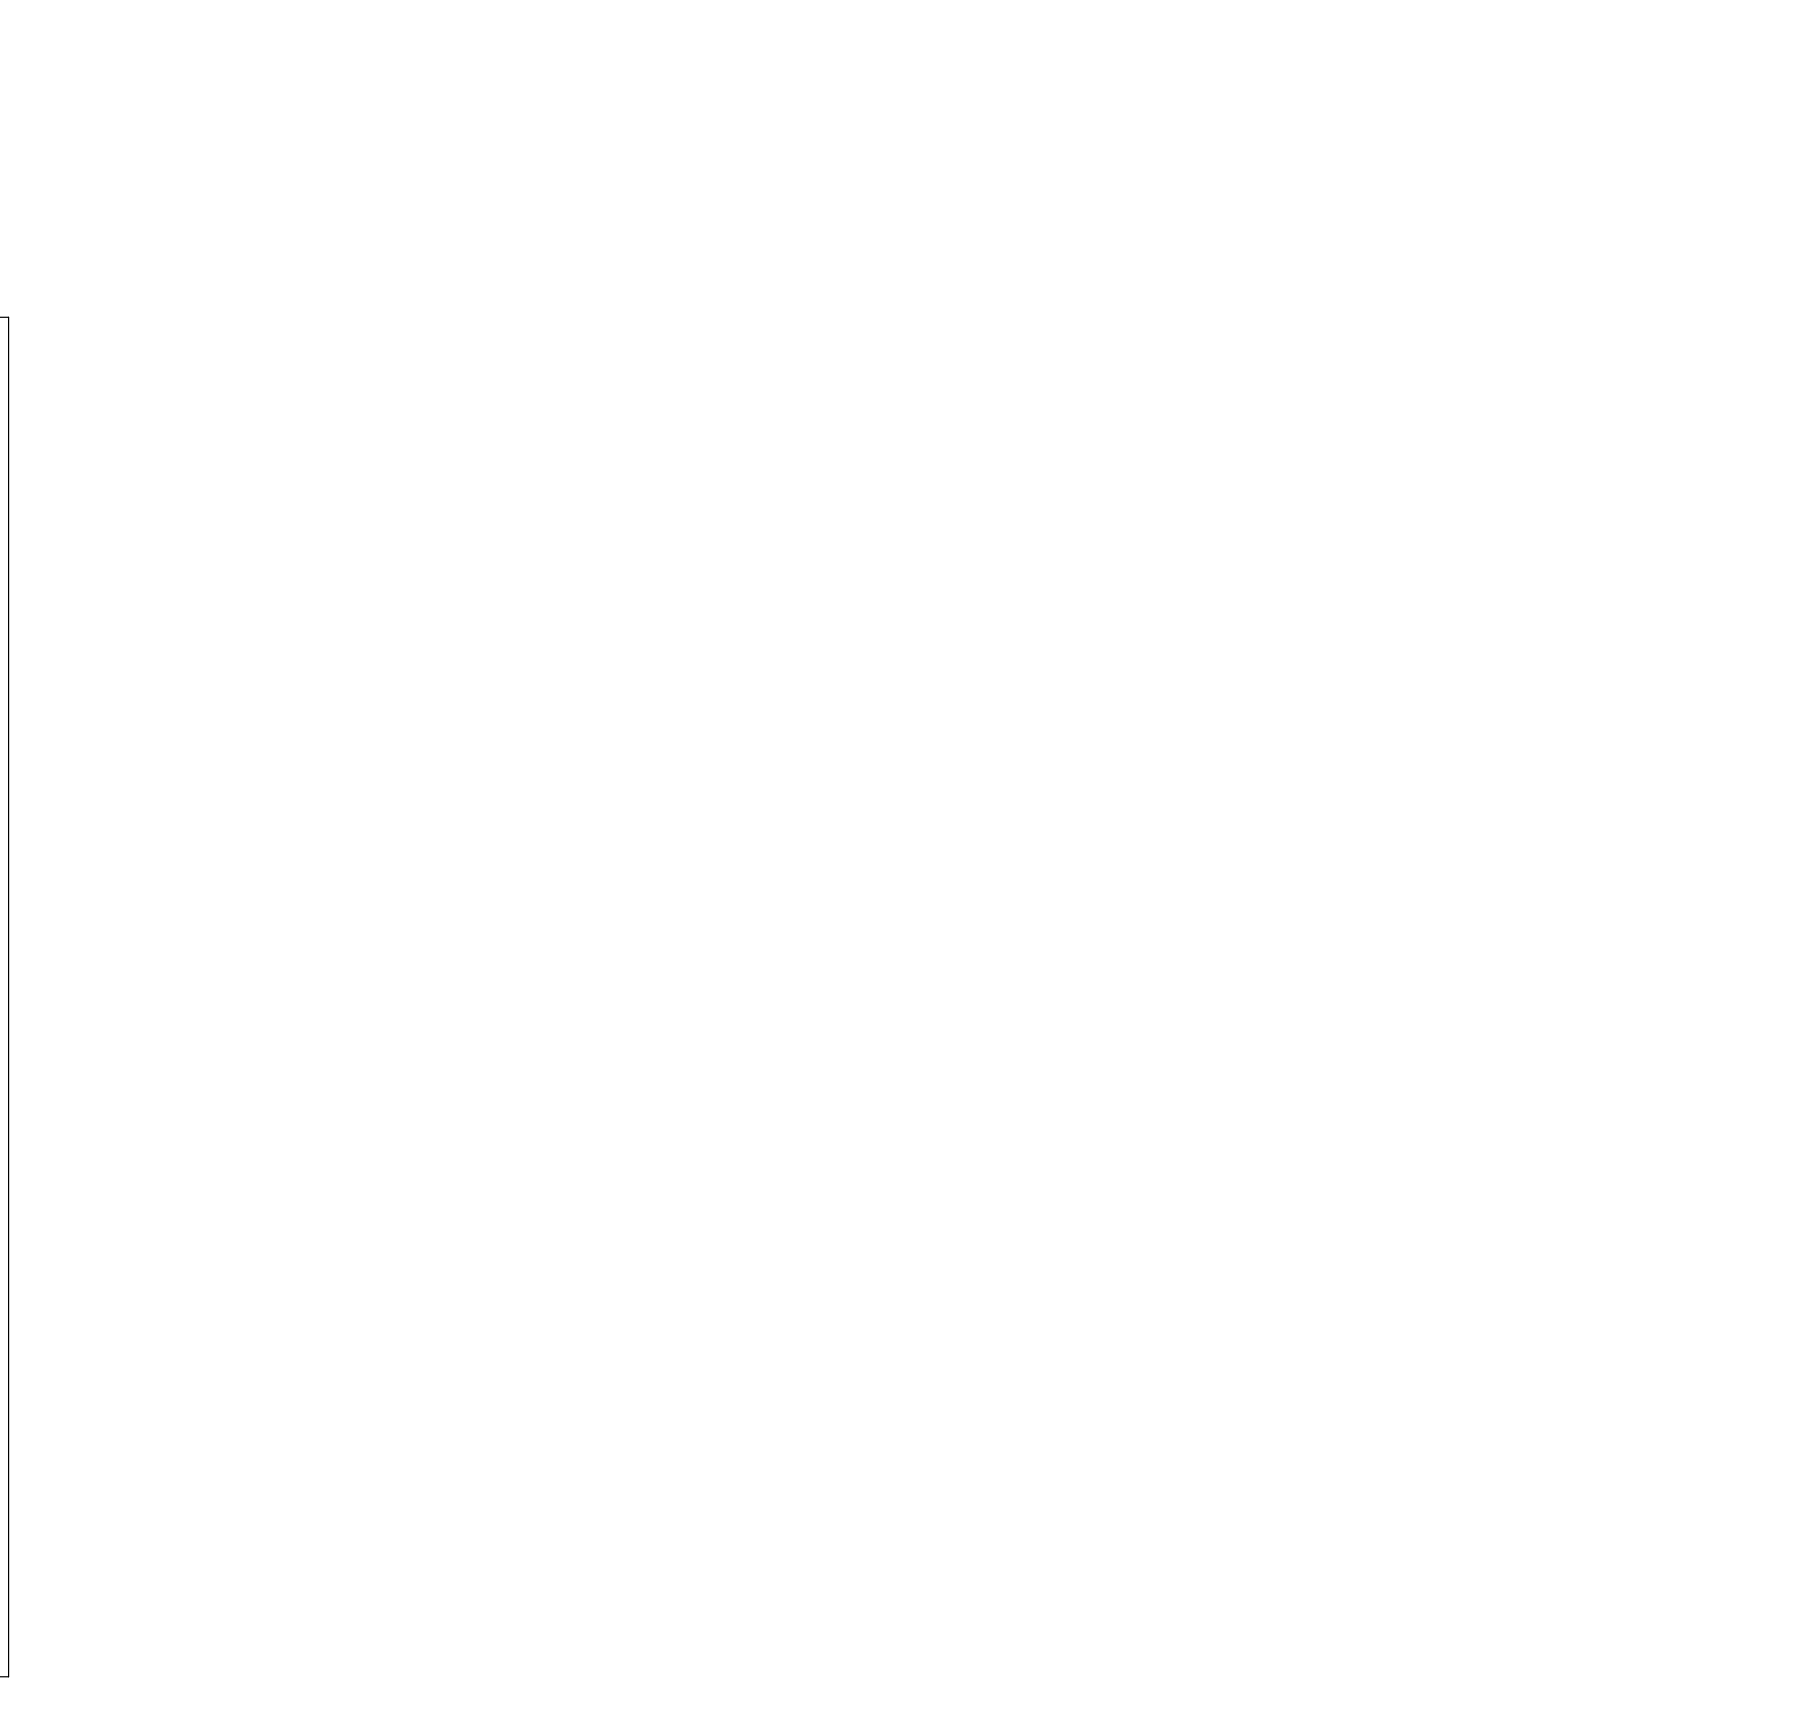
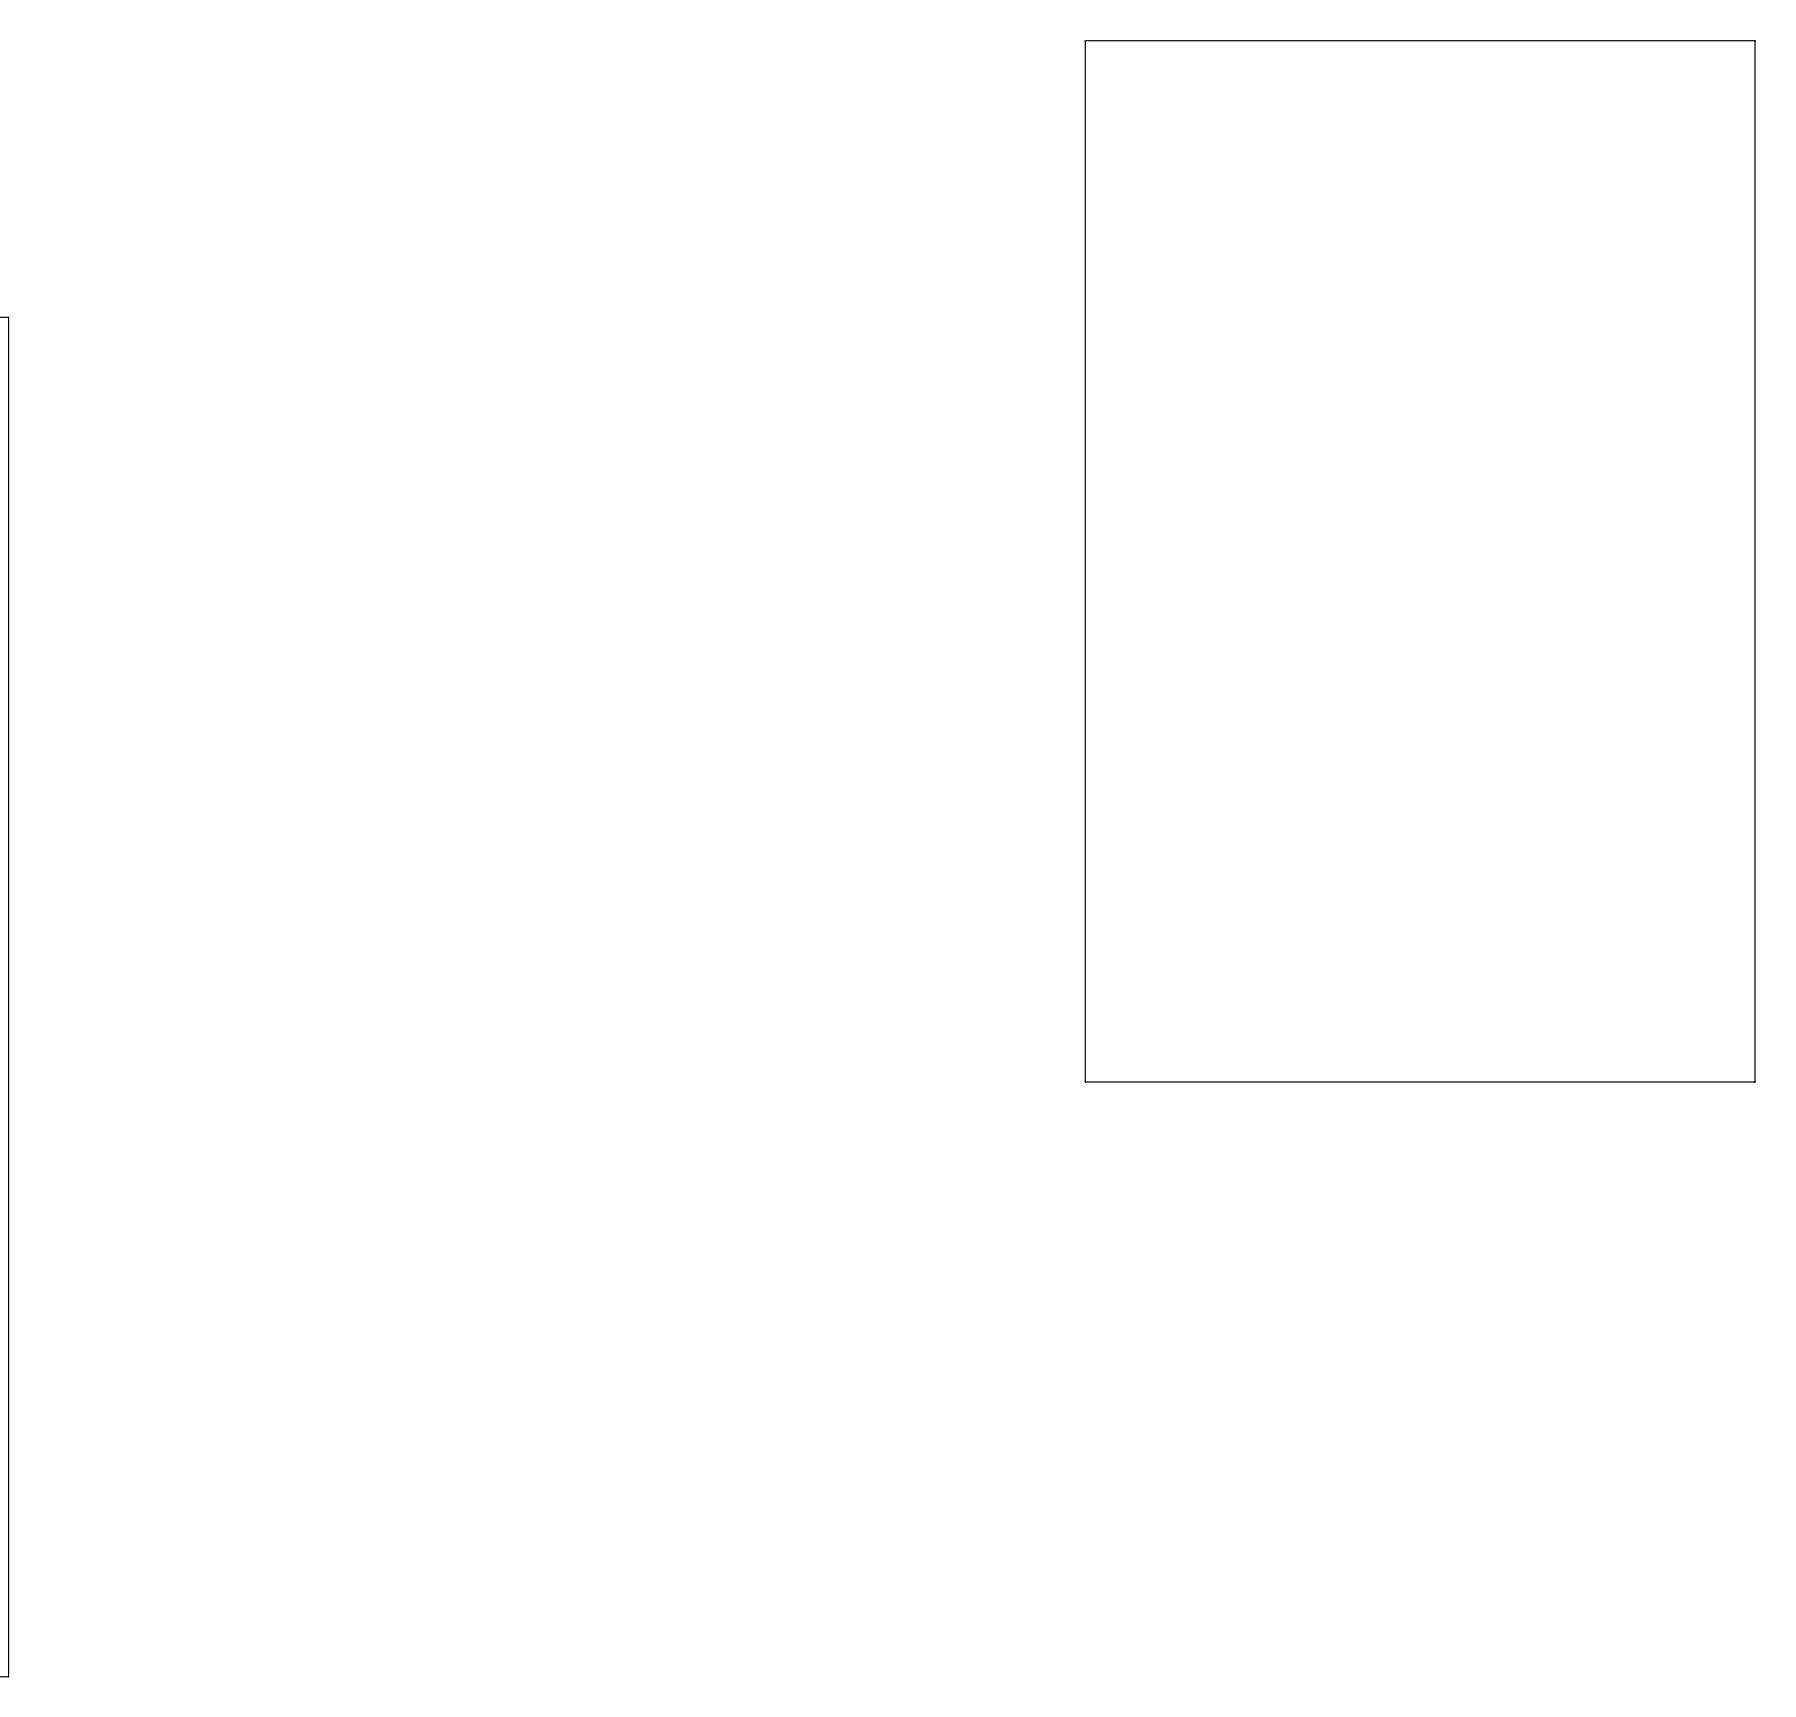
board edge: none -> (1755, 40) (1085, 40) (1085, 1081) (1755, 1081) (1755, 40)

